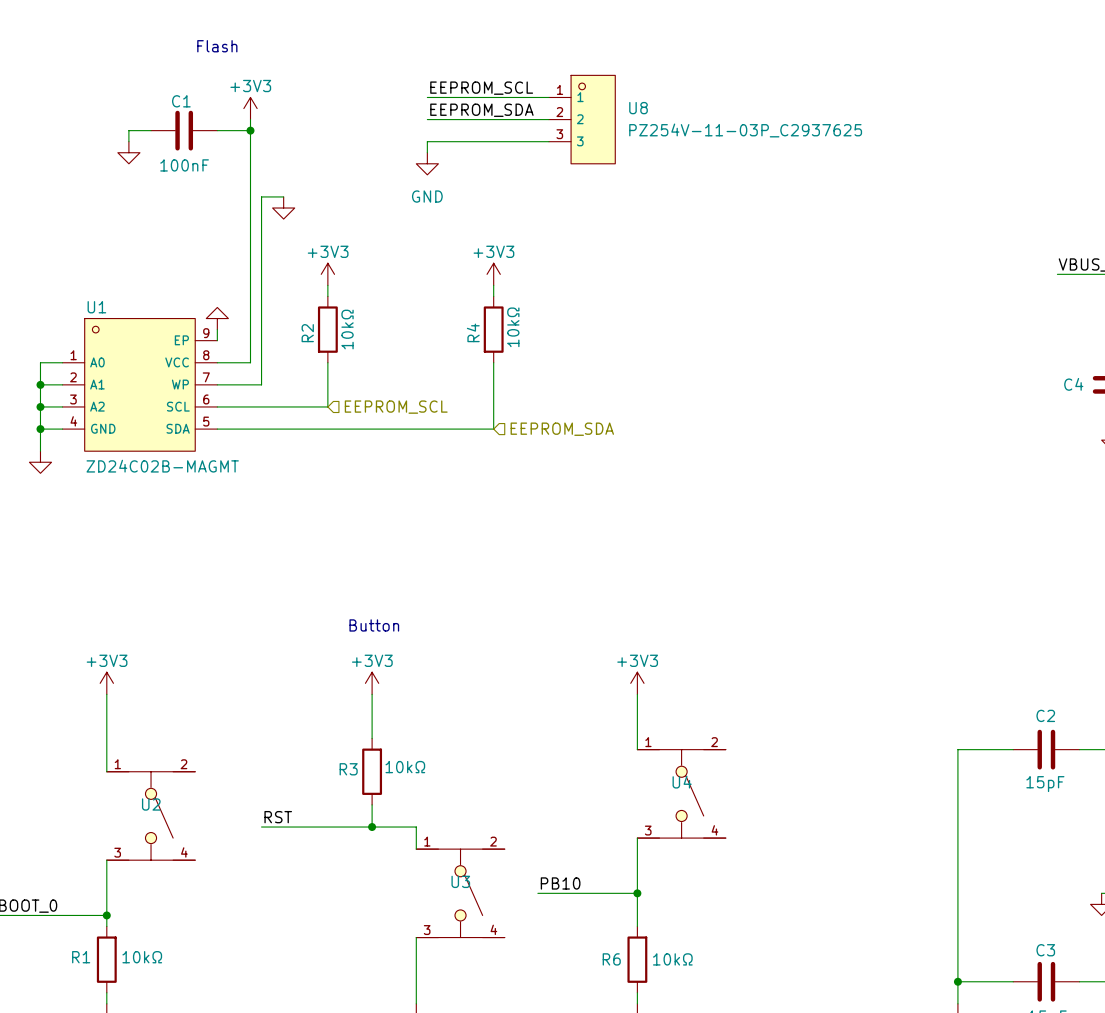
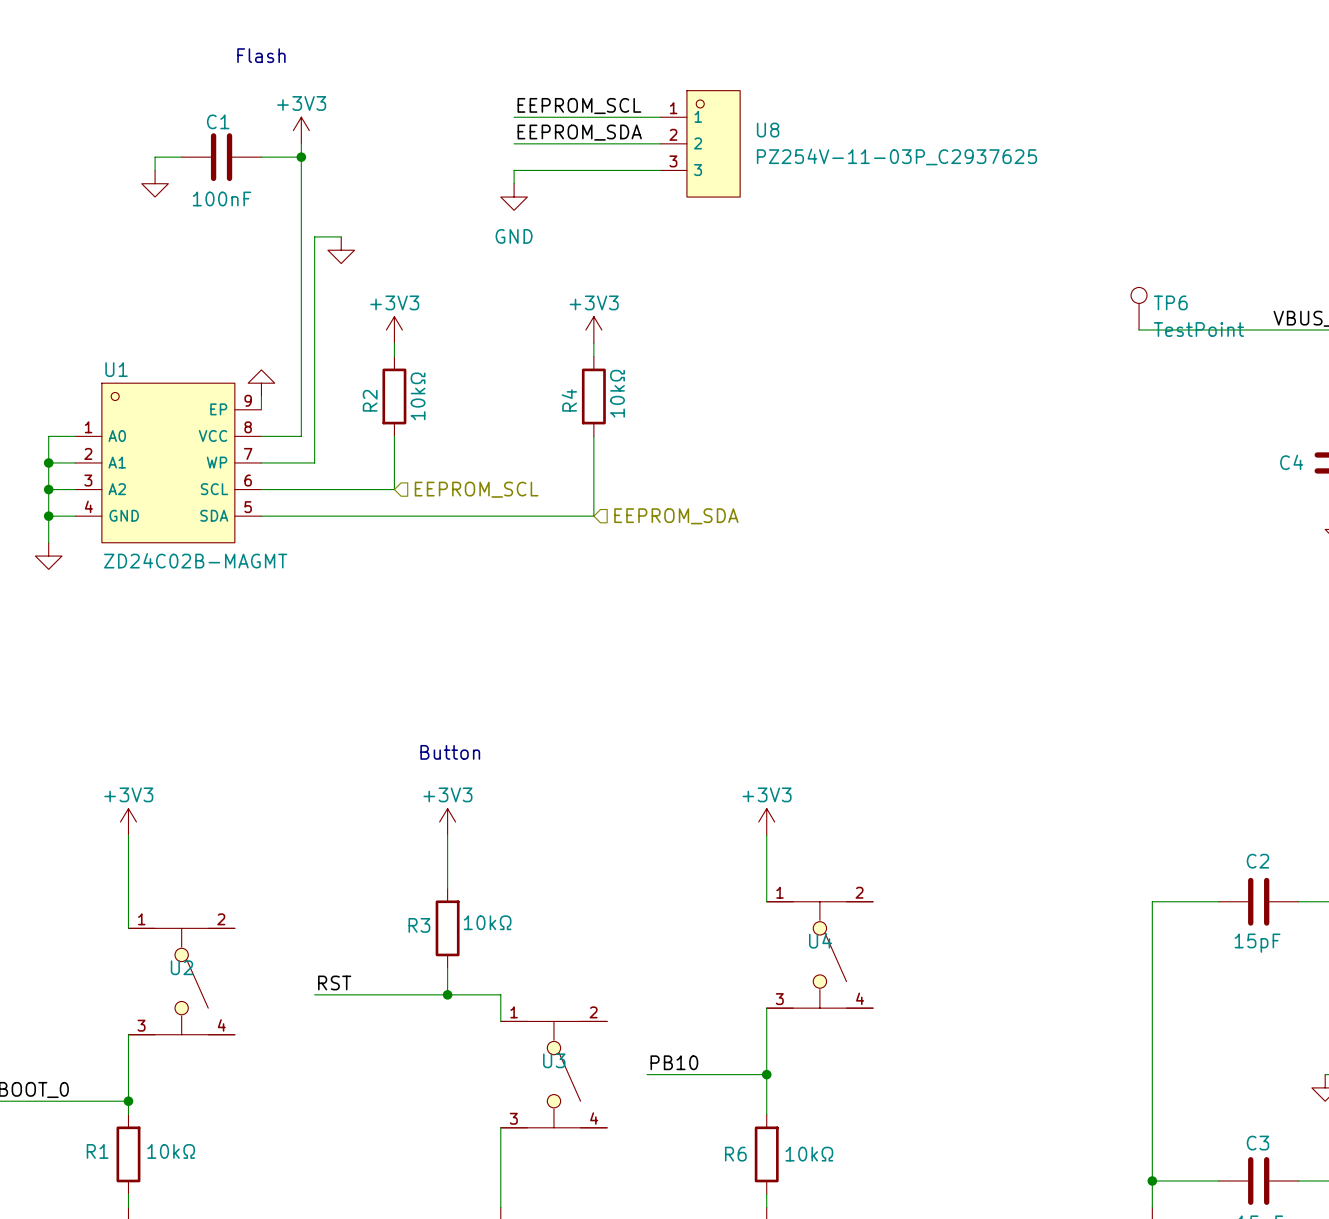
TP6: none -> TestPoint (1139, 308)
wire: none -> (1139, 330) (1272, 330)

